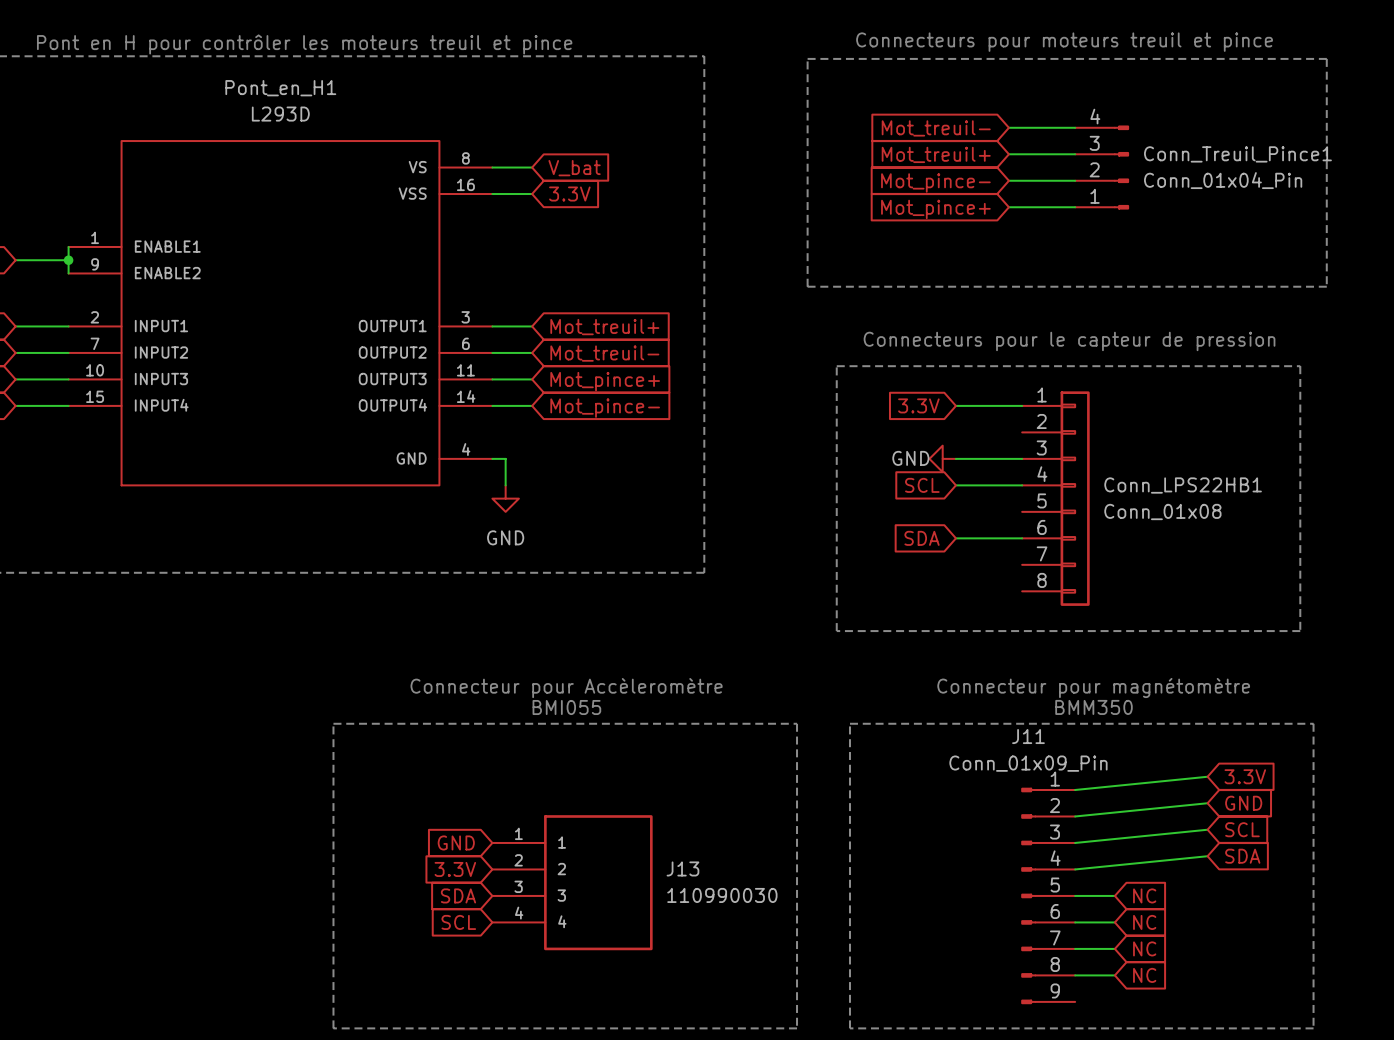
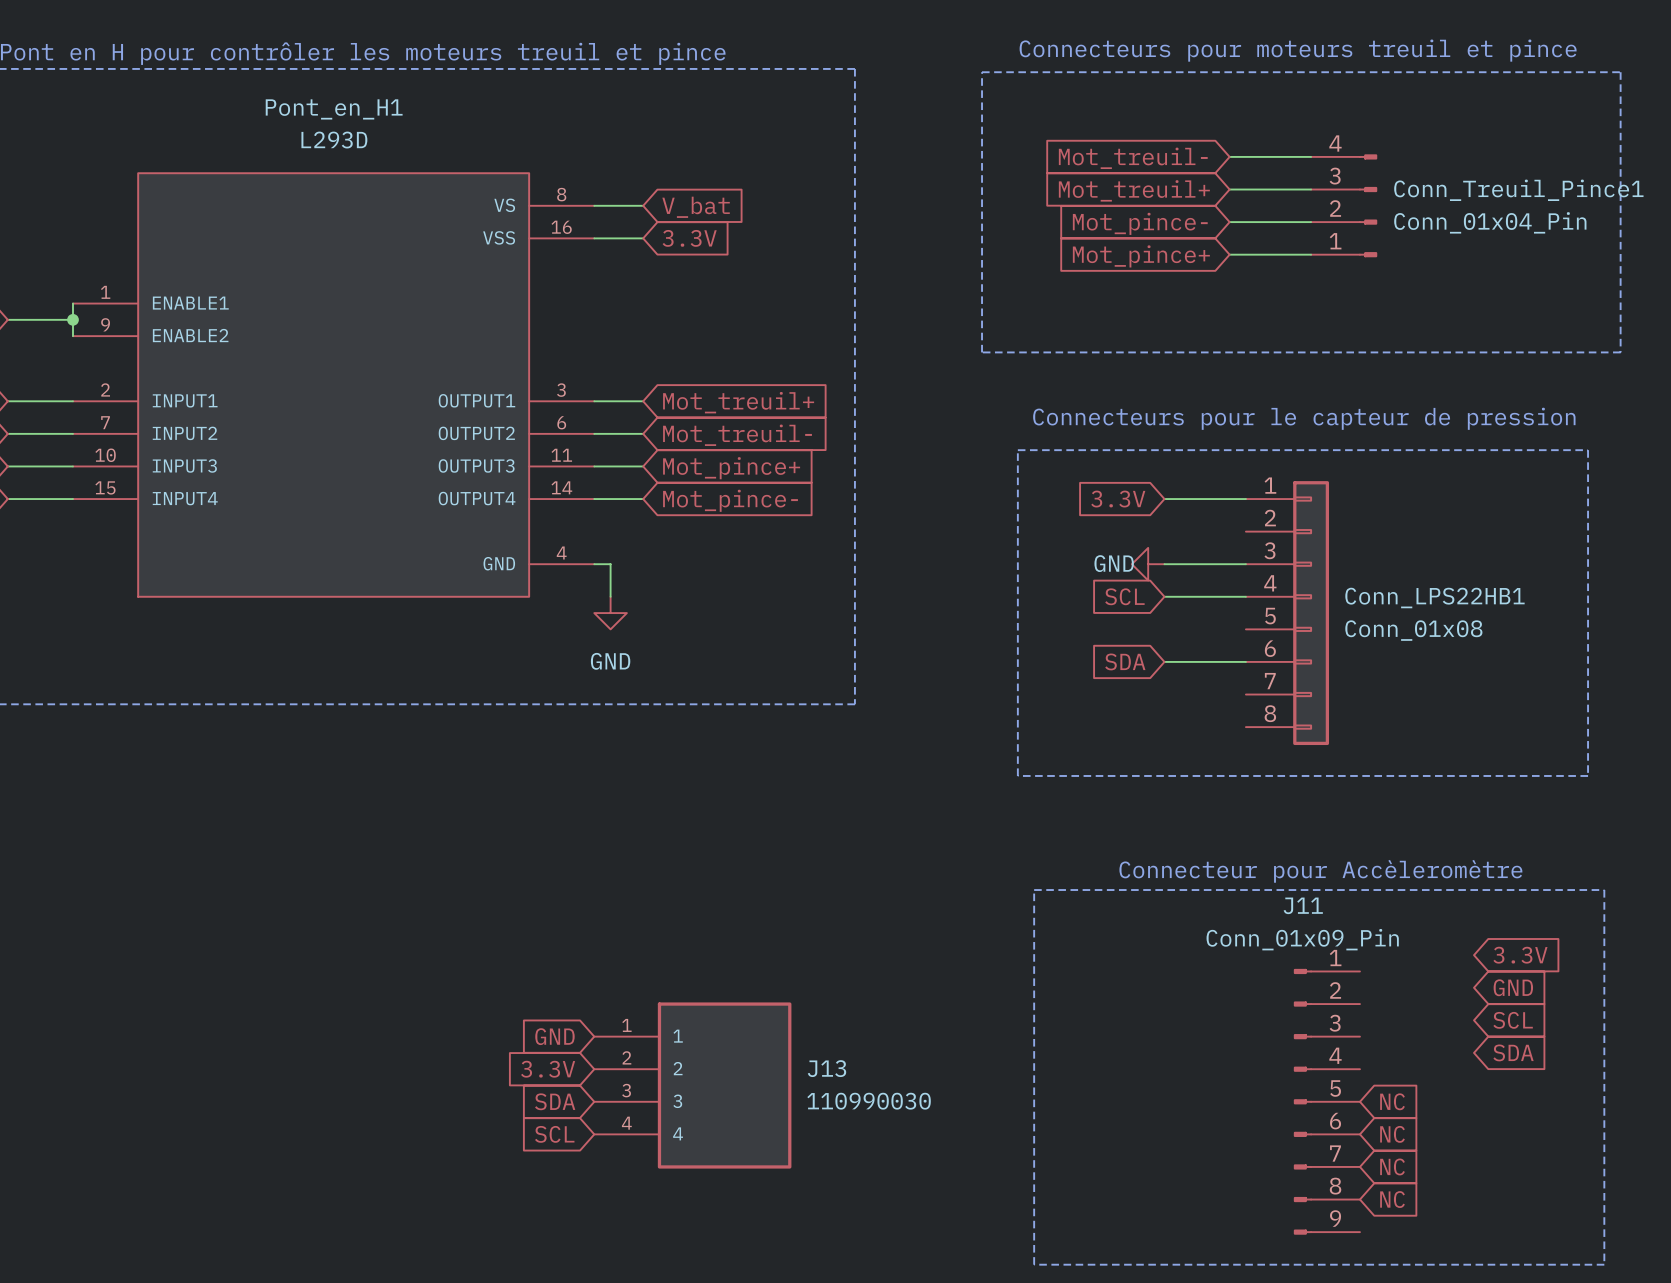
text: Connecteur pour magnétomètre (1093, 687) -> Connecteur pour Accèleromètre (1320, 871)
text: Connecteur pour Accèleromètre (566, 688) -> none
text: BMI055 (566, 707) -> none
text: BMM350 (1094, 707) -> none
line: (333, 723) (797, 723) (797, 1028) (333, 1028) (333, 723) -> none
wire: (1207, 776) (1075, 789) -> none
wire: (1207, 803) (1075, 816) -> none
wire: (1207, 829) (1075, 842) -> none
wire: (1207, 856) (1075, 869) -> none
J11 position: (1048, 895) -> (1326, 1101)

